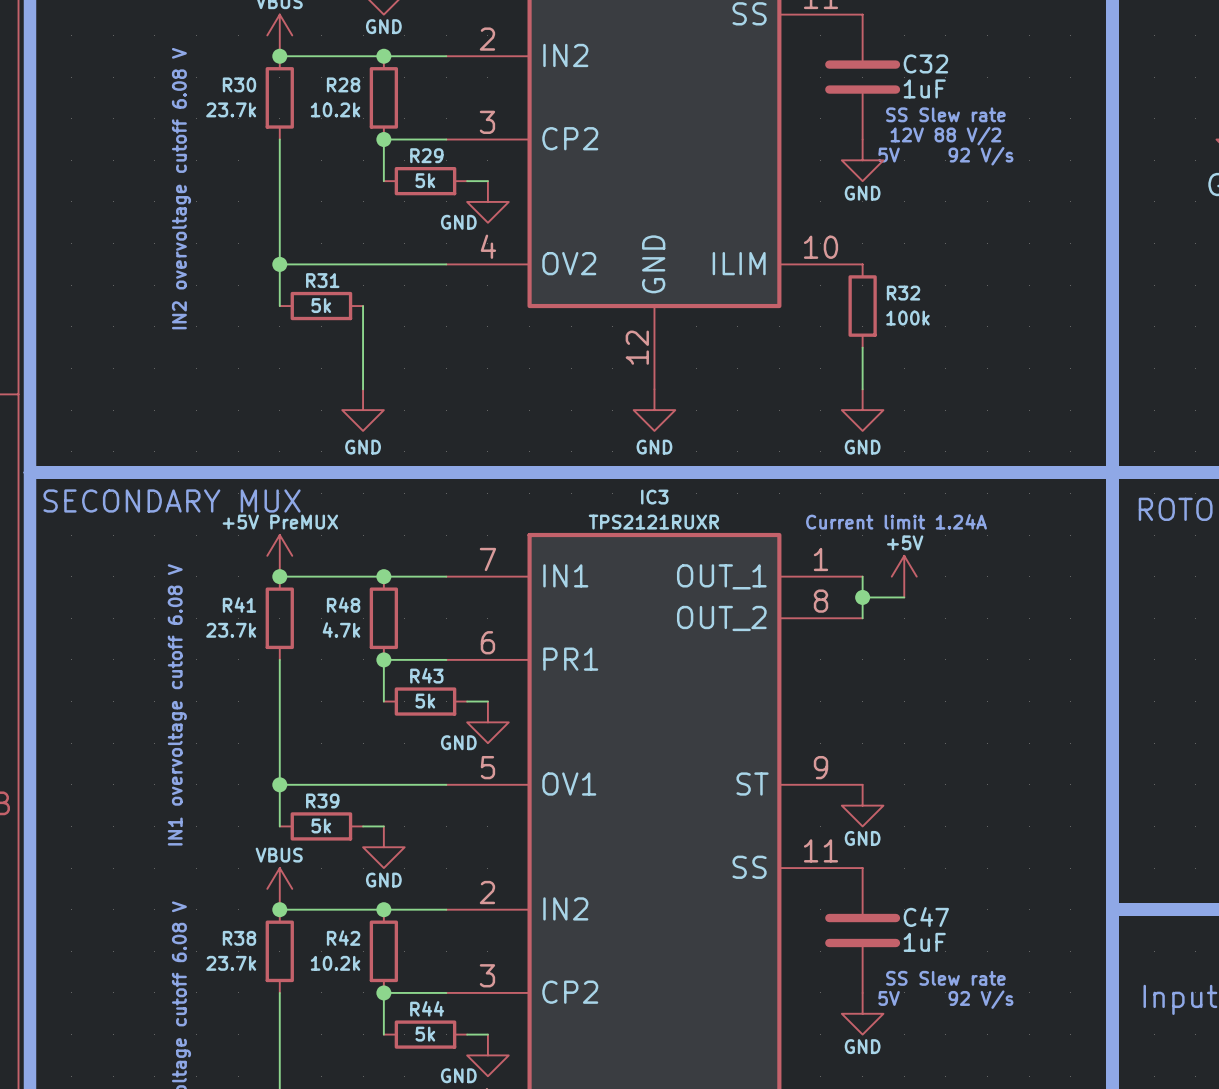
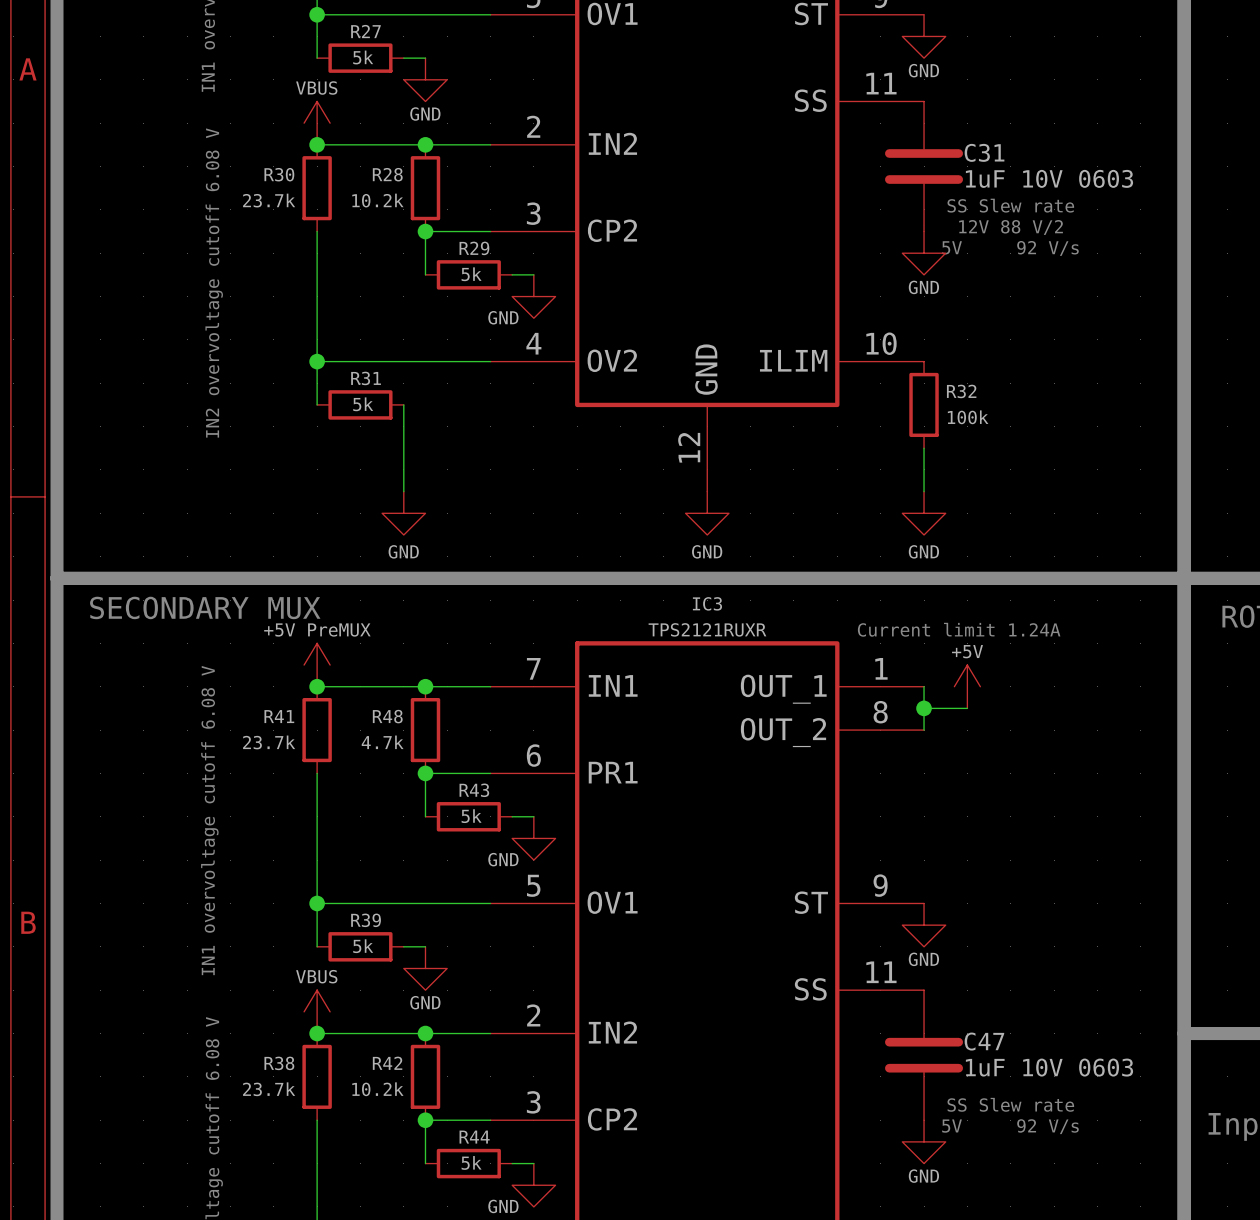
C32 name: C32 (925, 63) -> C31 (984, 152)
C32 value: 1uF (924, 88) -> 1uF 10V 0603 (1049, 178)
C47 value: 1uF (924, 942) -> 1uF 10V 0603 (1049, 1067)

